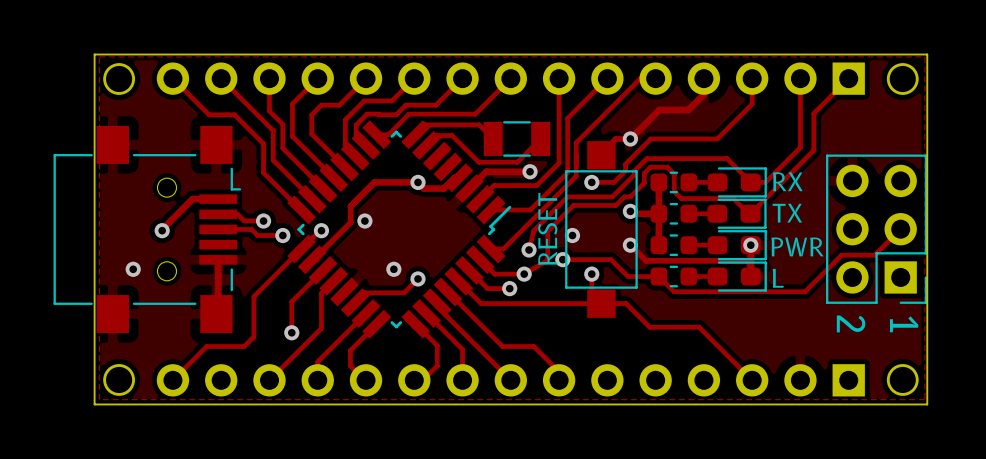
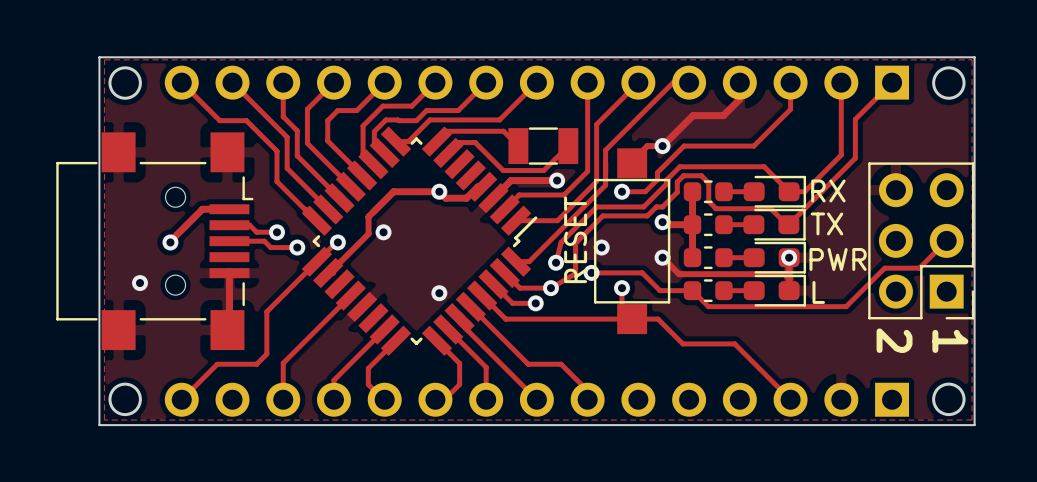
via: (393, 269) -> none
track: (323, 270) (291, 301) (291, 332) -> none
track: (418, 278) (404, 292) (365, 292) (355, 302) -> none
track: (321, 293) (321, 328) (269, 380) -> (338, 308) (283, 363) (283, 399)
via: (291, 332) -> none

